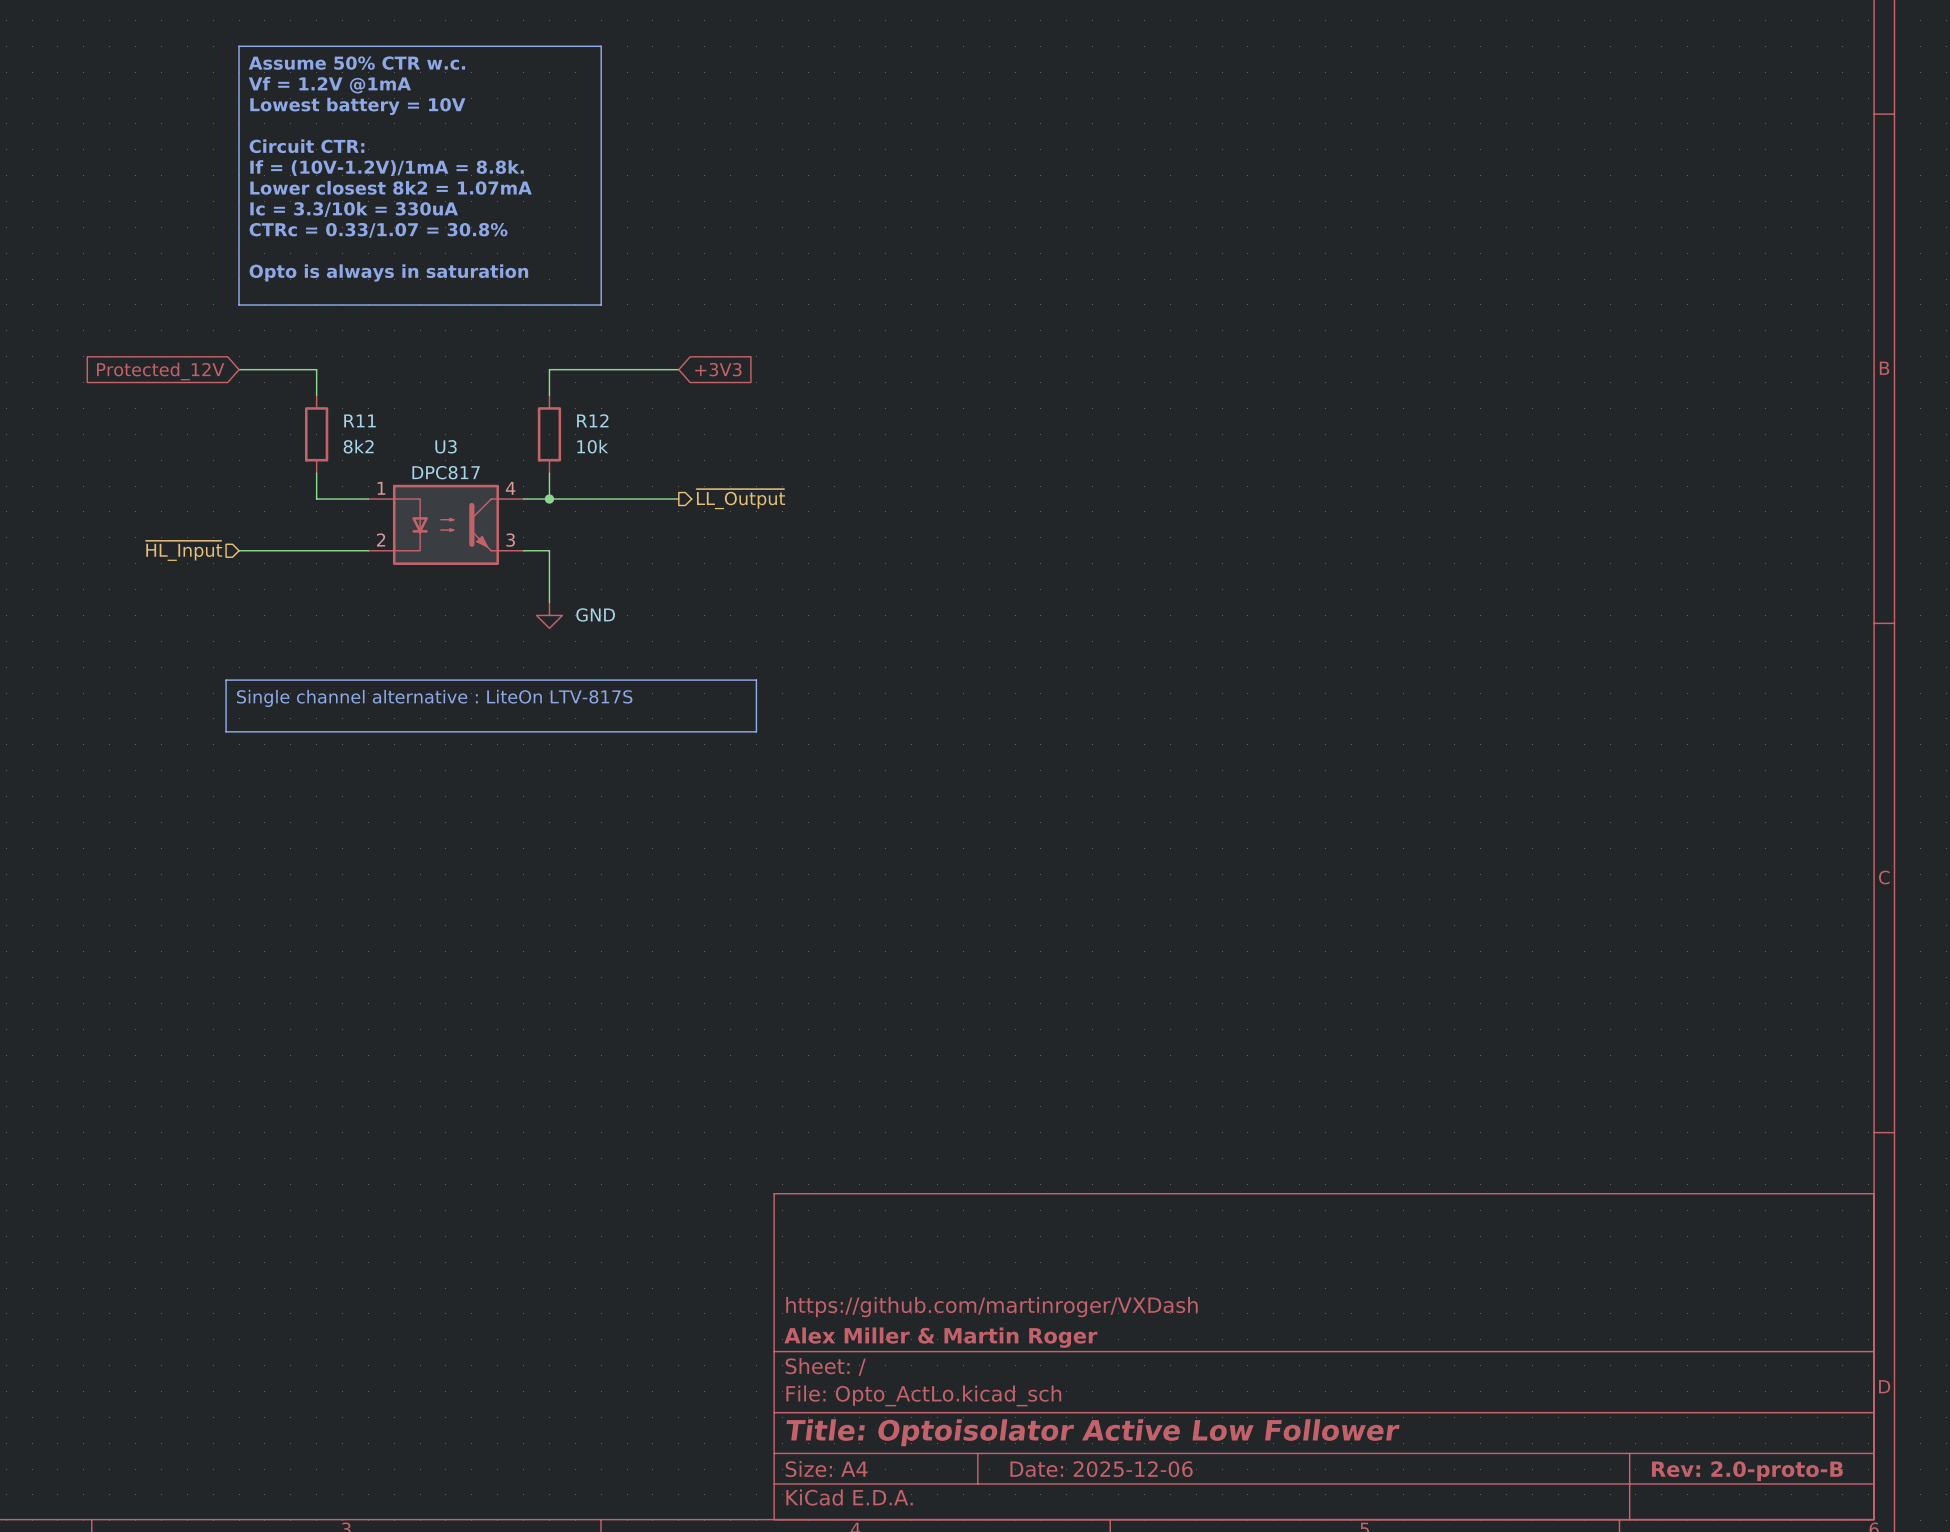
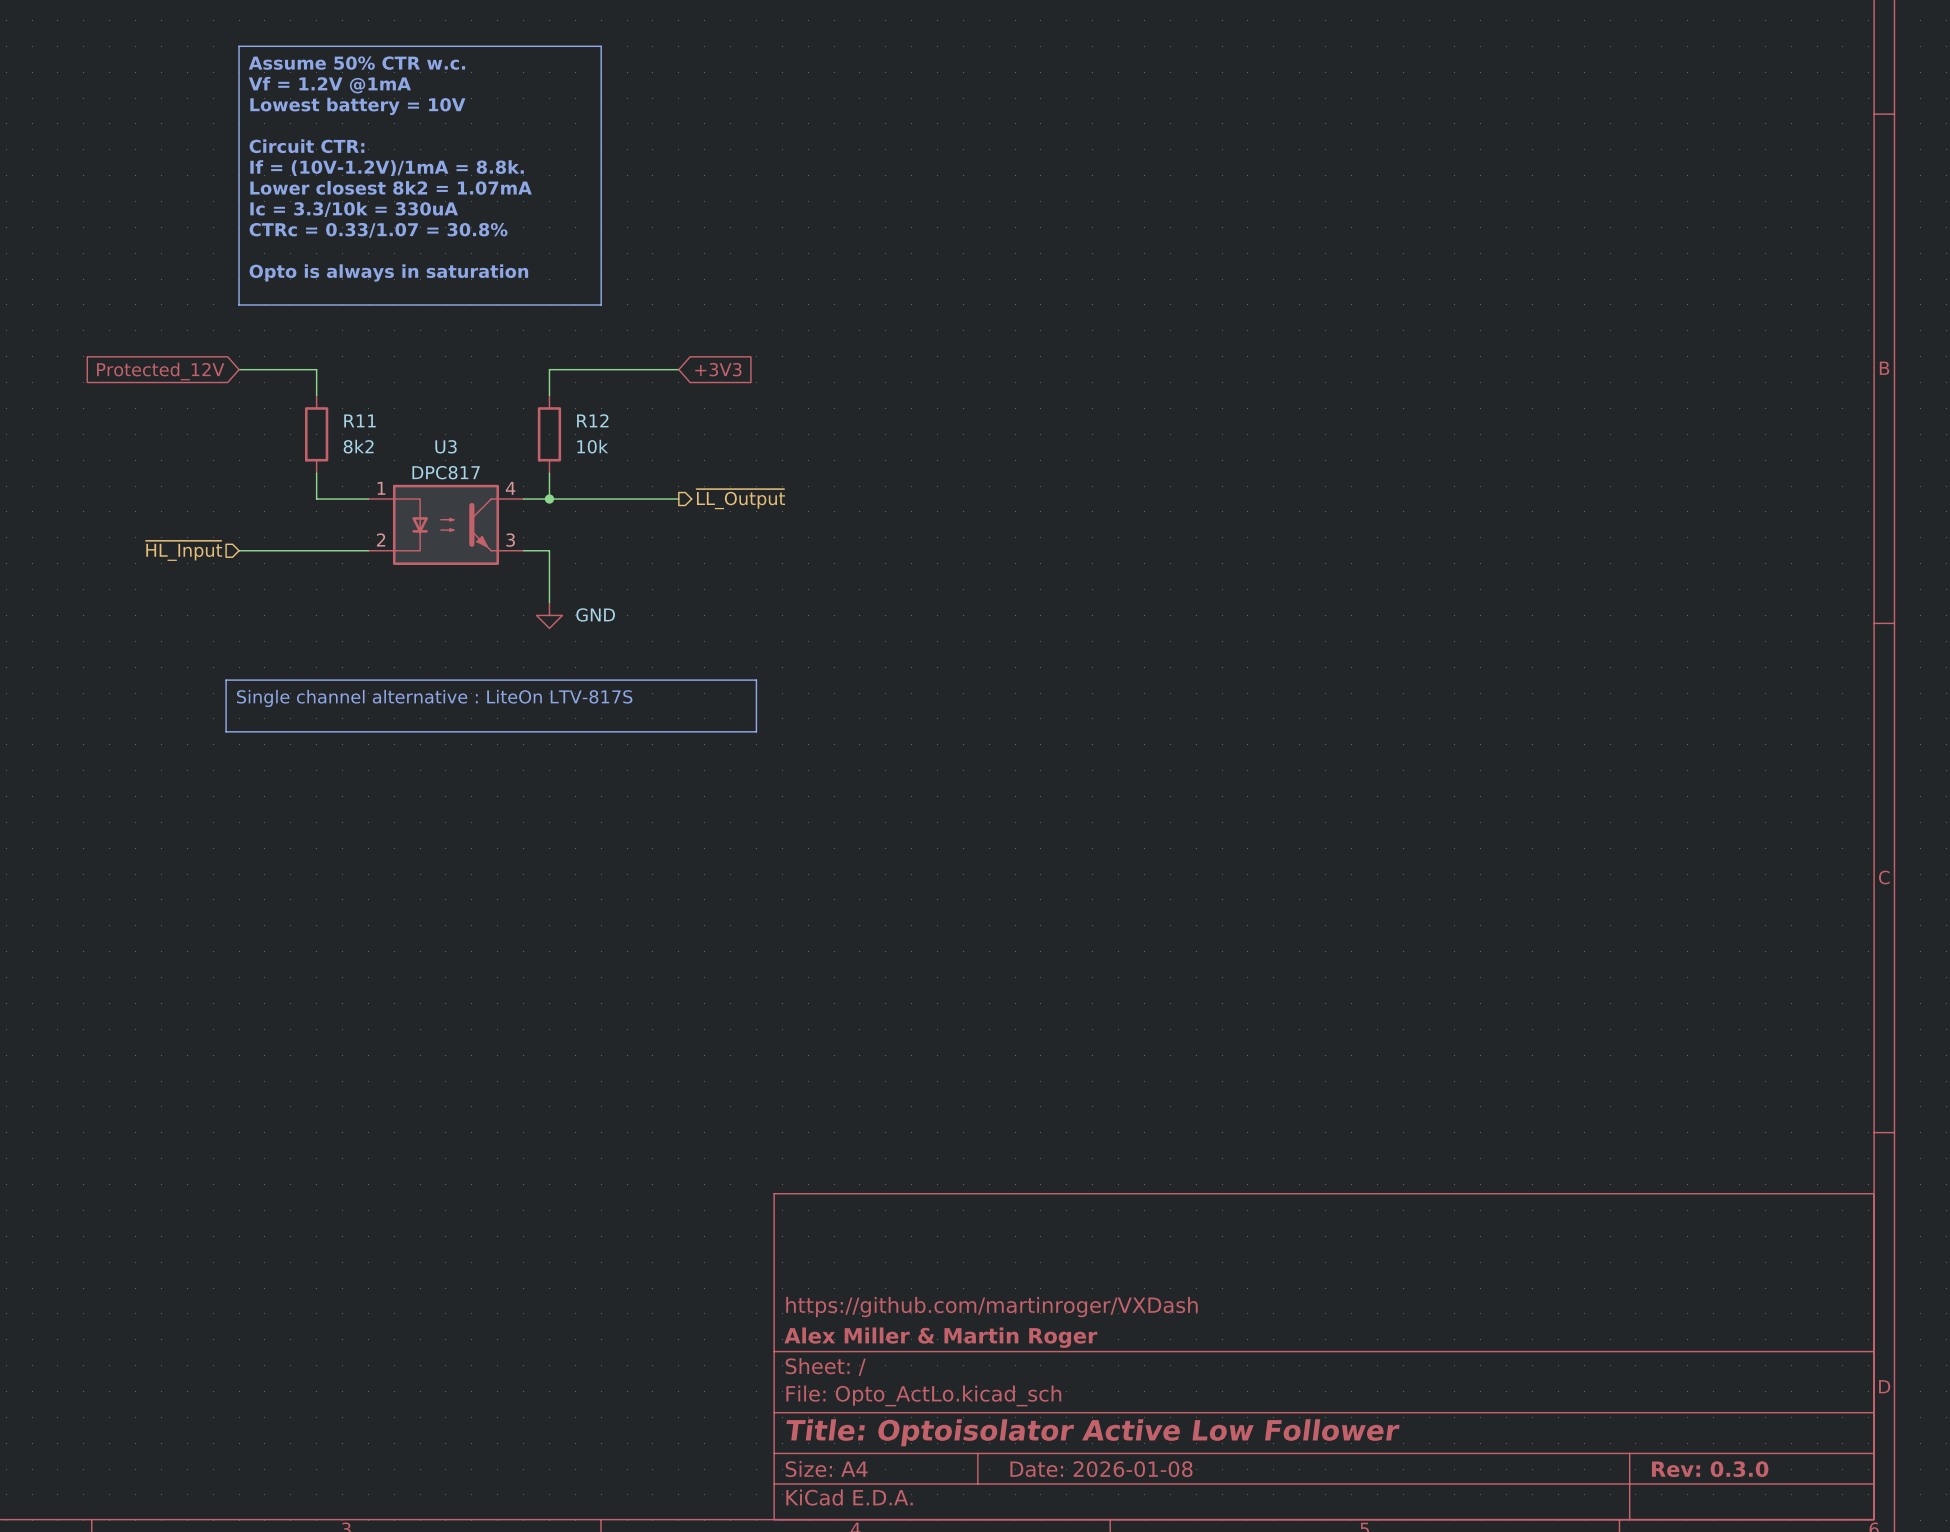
title block: Date: 2025-12-06 (1101, 1469) -> Date: 2026-01-08 (1101, 1469)
title block: Rev: 2.0-proto-B (1747, 1471) -> Rev: 0.3.0 (1710, 1469)

